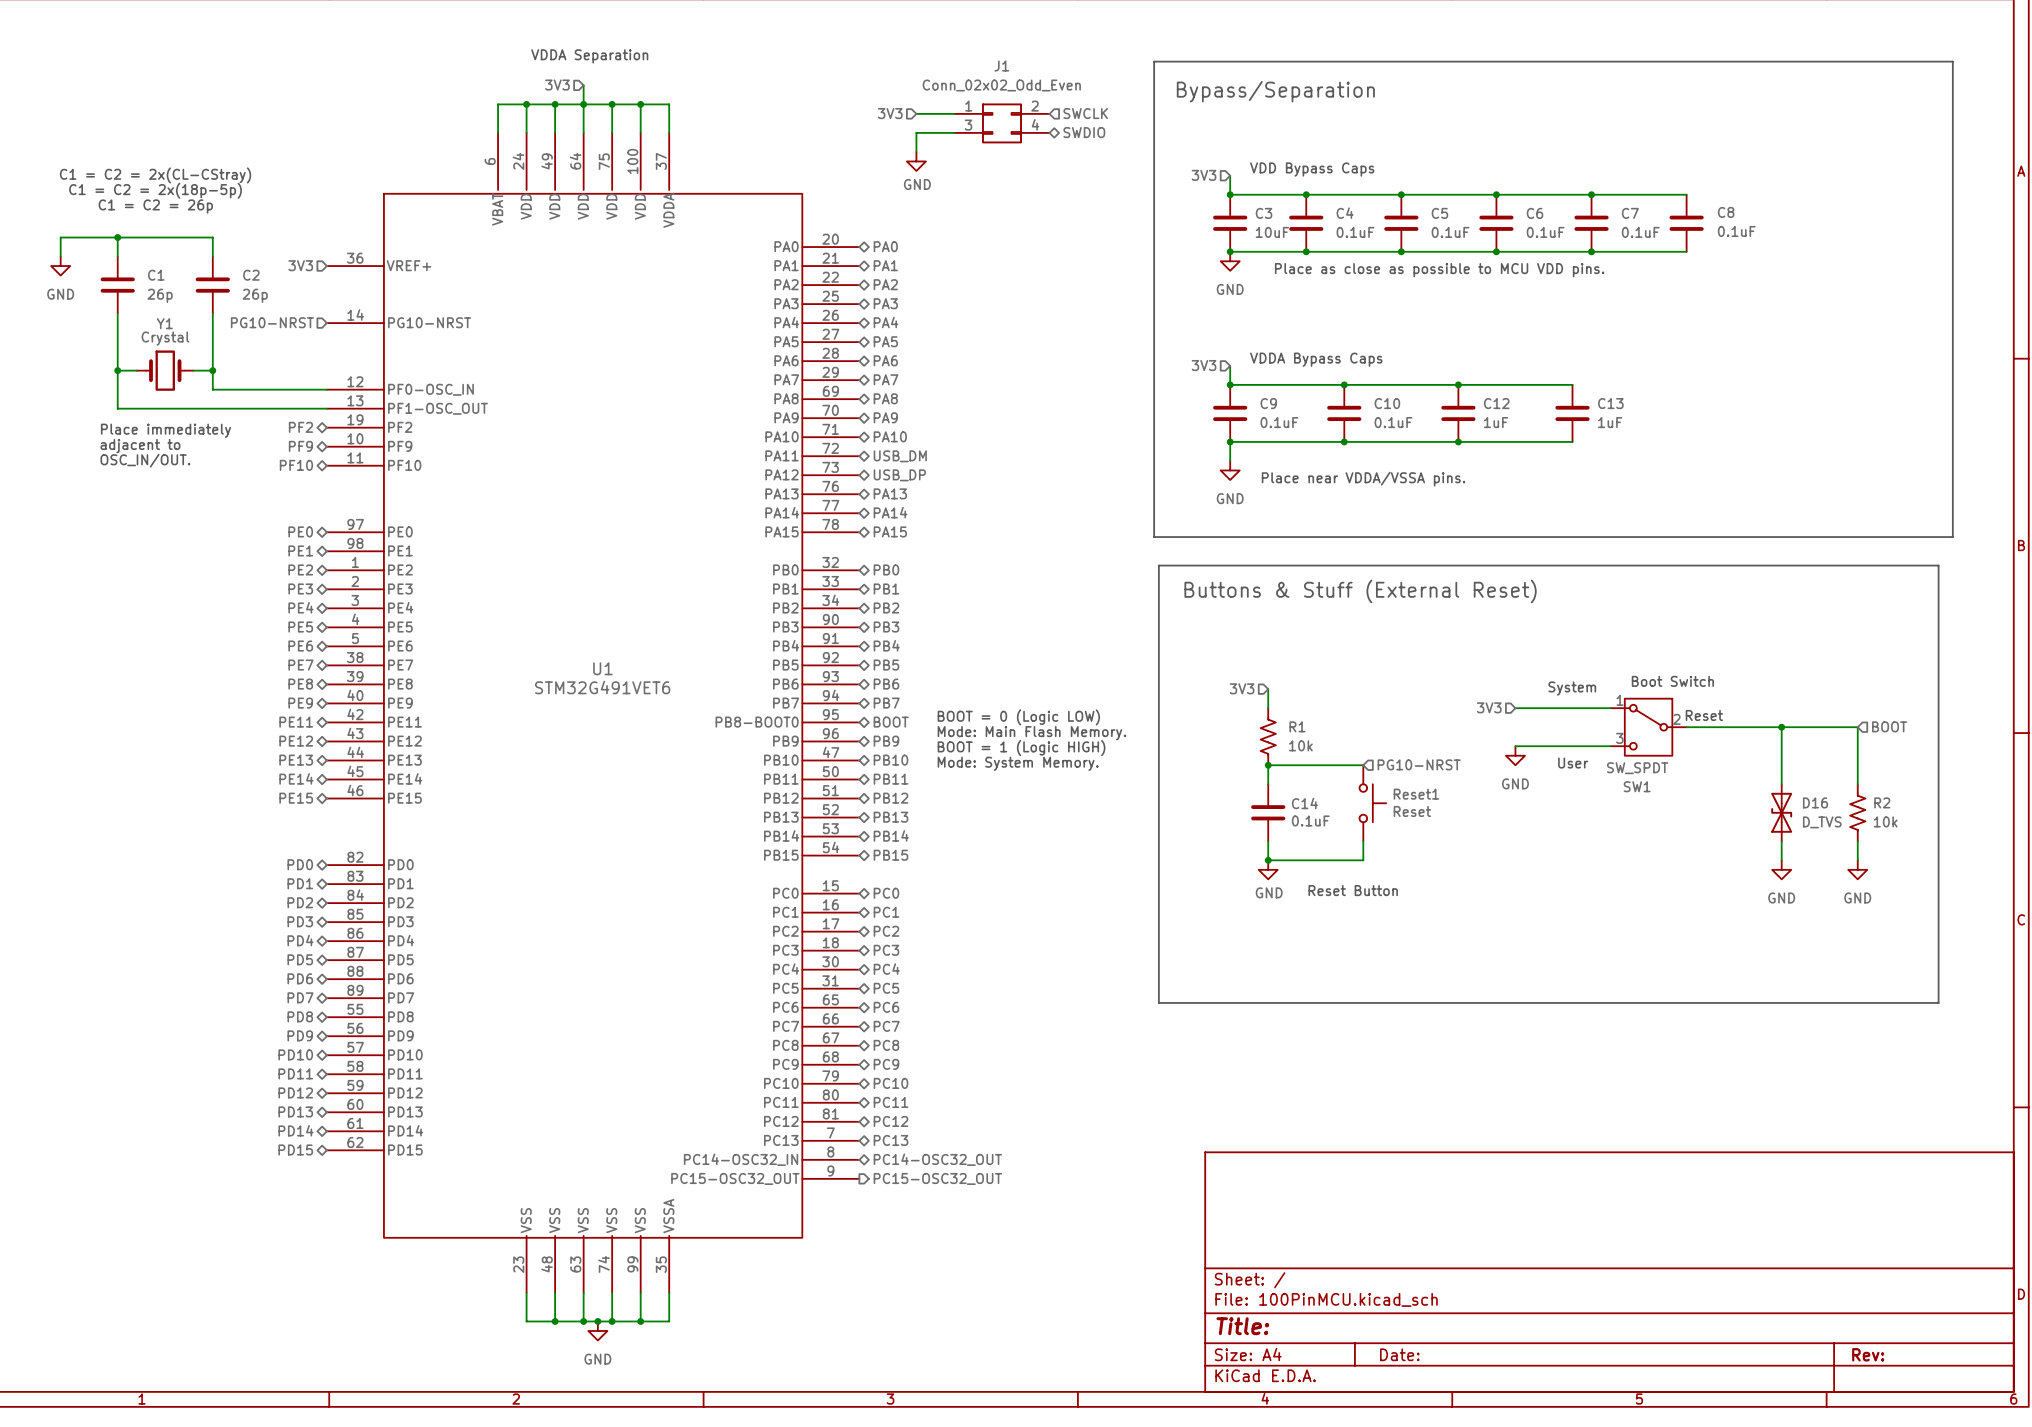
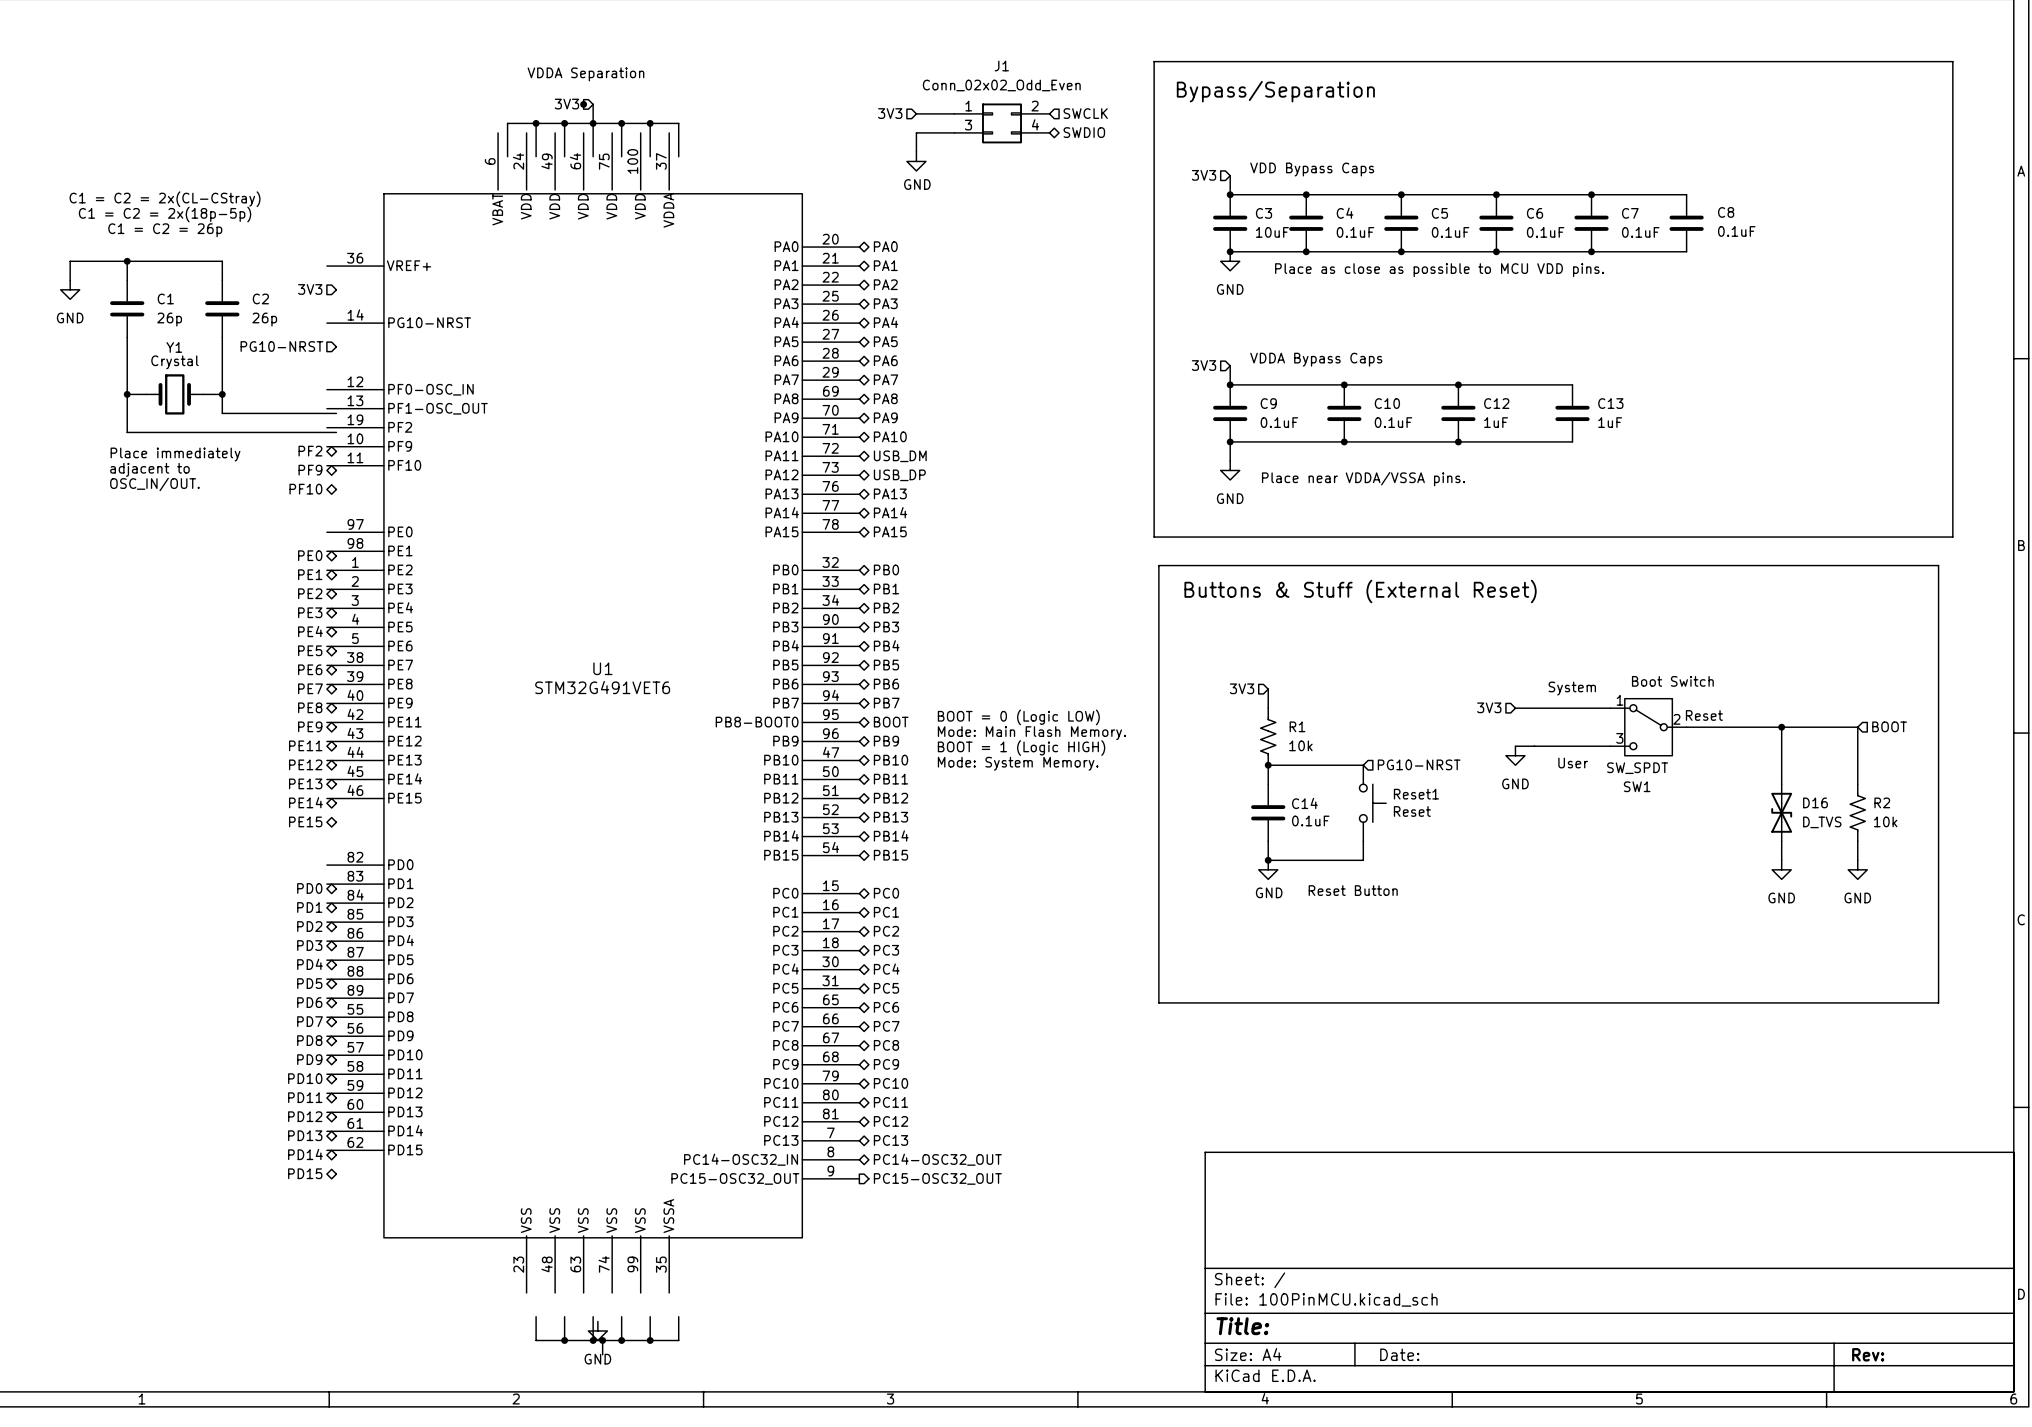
text position: VDDA Separation (589, 56) -> VDDA Separation (585, 74)
hierarchical label position: 3V3 (557, 85) -> 3V3 (566, 104)
wire: (583, 85) (583, 132) -> none
wire: (526, 104) (526, 132) -> none
junction: (526, 104) -> none
wire: (555, 104) (555, 132) -> none
junction: (555, 104) -> none
wire: none -> (593, 104) (593, 156)
wire: (612, 104) (612, 132) -> none
junction: (612, 104) -> none
wire: (640, 104) (640, 132) -> none
junction: (640, 104) -> none
wire: none -> (536, 123) (536, 156)
junction: none -> (536, 123)
wire: none -> (564, 123) (564, 156)
junction: none -> (564, 123)
junction: none -> (593, 123)
wire: none -> (621, 123) (621, 156)
junction: none -> (621, 123)
wire: none -> (650, 123) (650, 156)
junction: none -> (650, 123)
wire: (498, 132) (498, 104) (669, 104) (669, 132) -> none
wire: none -> (507, 156) (507, 123) (678, 123) (678, 156)
text position: C1 = C2 = 2x(CL-CStray) (155, 175) -> C1 = C2 = 2x(CL-CStray) (165, 199)
text position: C1 = C2 = 2x(18p-5p) (155, 190) -> C1 = C2 = 2x(18p-5p) (165, 214)
text position: C1 = C2 = 26p (155, 206) -> C1 = C2 = 26p (165, 230)
wire: (117, 237) (117, 256) -> (127, 261) (127, 280)
junction position: (117, 237) -> (127, 261)
wire: (60, 256) (60, 237) (212, 237) (212, 256) -> (70, 280) (70, 261) (222, 261) (222, 280)
hierarchical label position: 3V3 (300, 265) -> 3V3 (310, 289)
power symbol position: GND (60, 266) -> GND (70, 289)
C1 position: (117, 285) -> (127, 308)
C2 position: (212, 285) -> (222, 308)
wire: (117, 313) (117, 408) (326, 408) -> (127, 337) (127, 432) (336, 432)
wire: (212, 313) (212, 389) (326, 389) -> (222, 337) (222, 413) (336, 413)
hierarchical label position: PG10-NRST (272, 322) -> PG10-NRST (281, 346)
wire: (117, 370) (136, 370) -> (127, 394) (146, 394)
junction position: (117, 370) -> (127, 394)
Y1 position: (165, 370) -> (174, 394)
wire: (193, 370) (212, 370) -> (203, 394) (222, 394)
junction position: (212, 370) -> (222, 394)
hierarchical label position: PF2 (300, 427) -> PF2 (310, 451)
text position: Place immediately (166, 430) -> Place immediately (175, 454)
text position: adjacent to (140, 446) -> adjacent to (149, 469)
hierarchical label position: PF9 (300, 446) -> PF9 (310, 470)
text position: OSC_IN/OUT. (145, 460) -> OSC_IN/OUT. (154, 484)
hierarchical label position: PF10 (296, 465) -> PF10 (305, 489)
hierarchical label position: PE0 (300, 531) -> PE0 (310, 555)
hierarchical label position: PE1 (300, 550) -> PE1 (310, 574)
hierarchical label position: PE2 (300, 569) -> PE2 (310, 593)
hierarchical label position: PE3 (300, 588) -> PE3 (310, 612)
hierarchical label position: PE4 (300, 607) -> PE4 (310, 631)
hierarchical label position: PE5 (300, 627) -> PE5 (310, 650)
hierarchical label position: PE6 (300, 646) -> PE6 (310, 669)
hierarchical label position: PE7 (300, 665) -> PE7 (310, 688)
hierarchical label position: PE8 (300, 684) -> PE8 (310, 707)
hierarchical label position: PE9 (300, 703) -> PE9 (310, 726)
hierarchical label position: PE11 (296, 722) -> PE11 (305, 745)
hierarchical label position: PE12 (296, 741) -> PE12 (305, 764)
hierarchical label position: PE13 (296, 760) -> PE13 (305, 783)
hierarchical label position: PE14 (296, 778) -> PE14 (305, 802)
hierarchical label position: PE15 (296, 798) -> PE15 (305, 821)
hierarchical label position: PD0 (300, 864) -> PD0 (309, 888)
hierarchical label position: PD1 (300, 883) -> PD1 (309, 907)
hierarchical label position: PD2 (300, 902) -> PD2 (309, 926)
hierarchical label position: PD3 (300, 921) -> PD3 (309, 945)
hierarchical label position: PD4 (300, 940) -> PD4 (310, 964)
hierarchical label position: PD5 (300, 959) -> PD5 (309, 983)
hierarchical label position: PD6 (300, 978) -> PD6 (309, 1002)
hierarchical label position: PD7 (300, 997) -> PD7 (310, 1021)
hierarchical label position: PD8 (300, 1016) -> PD8 (309, 1040)
hierarchical label position: PD9 (300, 1035) -> PD9 (309, 1059)
hierarchical label position: PD10 (295, 1054) -> PD10 (305, 1078)
hierarchical label position: PD11 (295, 1073) -> PD11 (305, 1097)
hierarchical label position: PD12 (295, 1092) -> PD12 (305, 1116)
hierarchical label position: PD13 (295, 1111) -> PD13 (305, 1135)
hierarchical label position: PD14 (295, 1130) -> PD14 (305, 1154)
hierarchical label position: PD15 (295, 1149) -> PD15 (305, 1173)
wire: (526, 1292) (526, 1321) (669, 1321) (669, 1292) -> none
wire: (555, 1292) (555, 1321) -> none
wire: (583, 1292) (583, 1321) -> none
wire: (612, 1292) (612, 1321) -> none
wire: (640, 1292) (640, 1321) -> none
wire: none -> (536, 1316) (536, 1340) (678, 1340) (678, 1316)
wire: none -> (564, 1316) (564, 1340)
wire: none -> (593, 1316) (593, 1340)
wire: none -> (621, 1316) (621, 1340)
wire: none -> (650, 1316) (650, 1340)
junction: (555, 1321) -> none
junction: (583, 1321) -> none
junction: (597, 1321) -> none
junction: (612, 1321) -> none
junction: (640, 1321) -> none
junction: none -> (564, 1340)
junction: none -> (593, 1340)
wire: none -> (602, 1340) (602, 1354)
junction: none -> (602, 1340)
junction: none -> (621, 1340)
junction: none -> (650, 1340)

